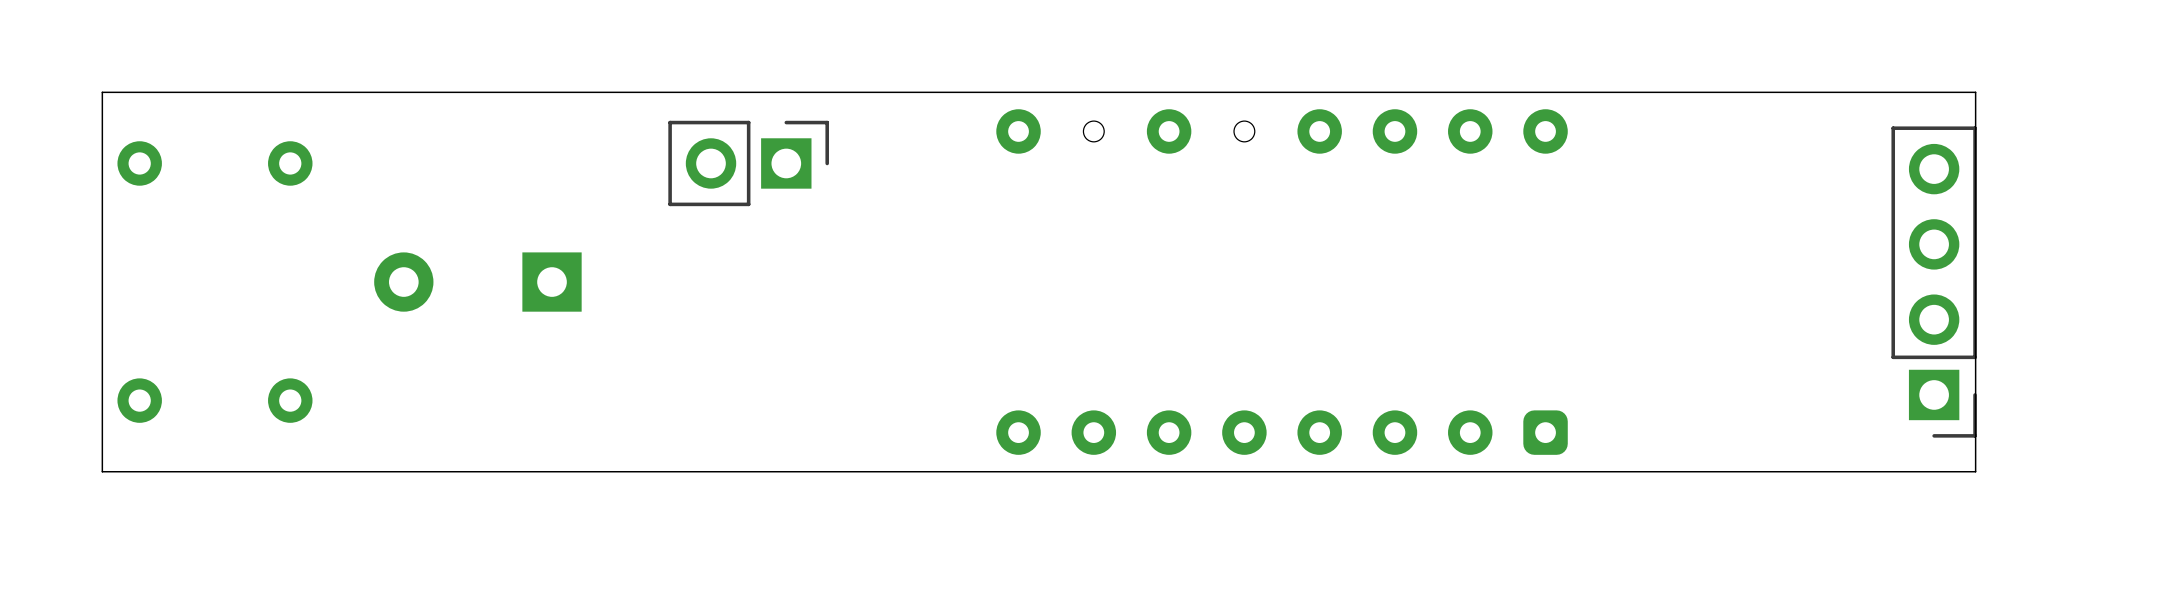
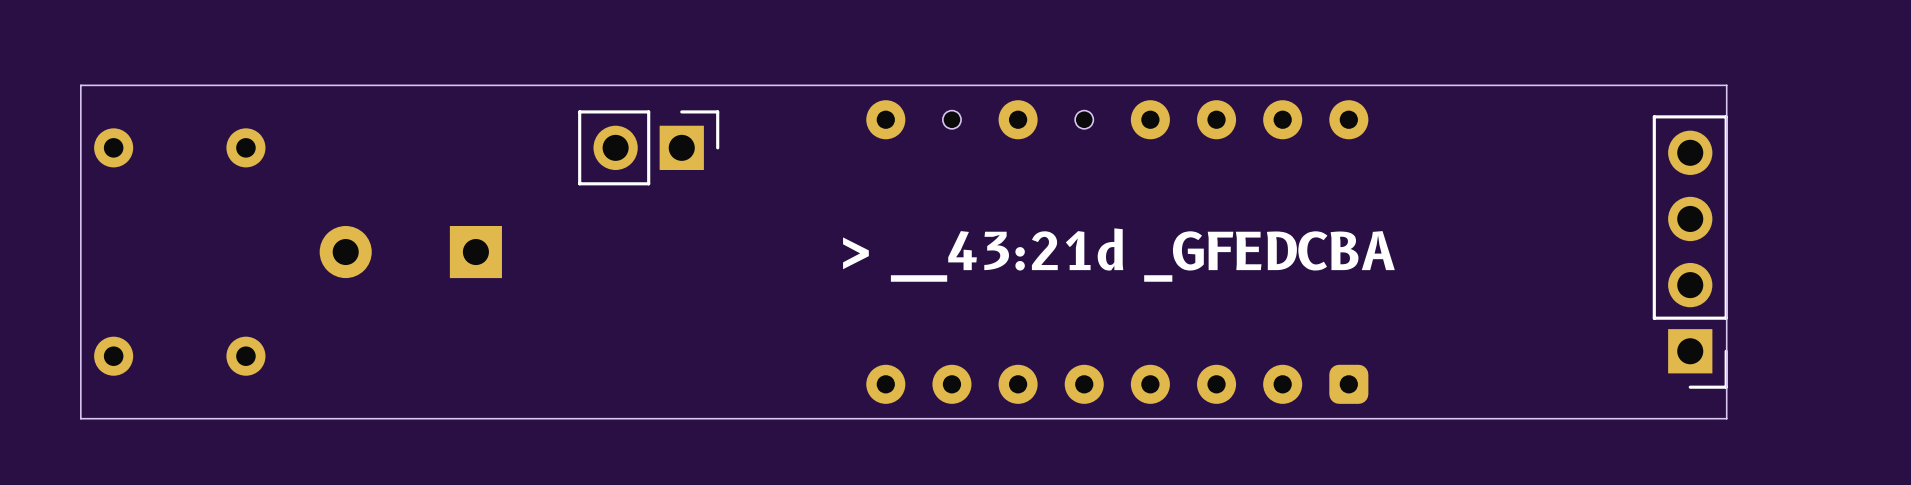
text: none -> > __43:21d _GFEDCBA (1118, 255)

